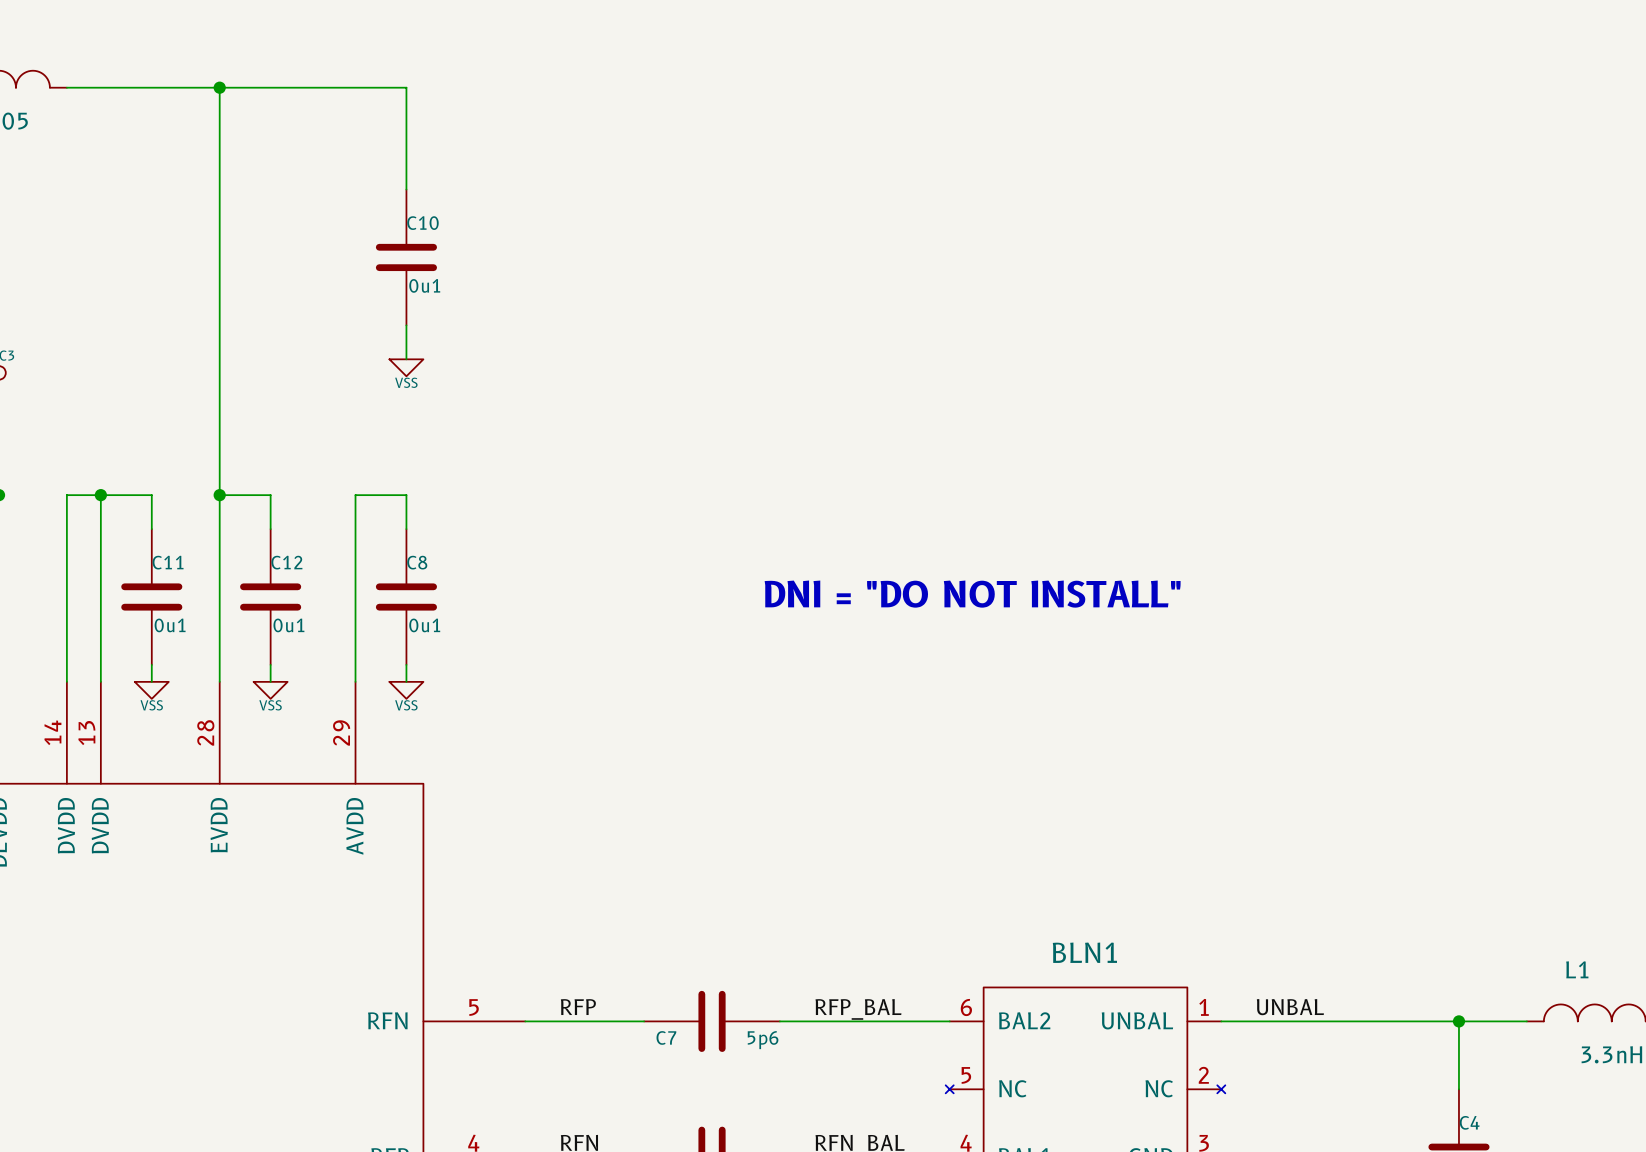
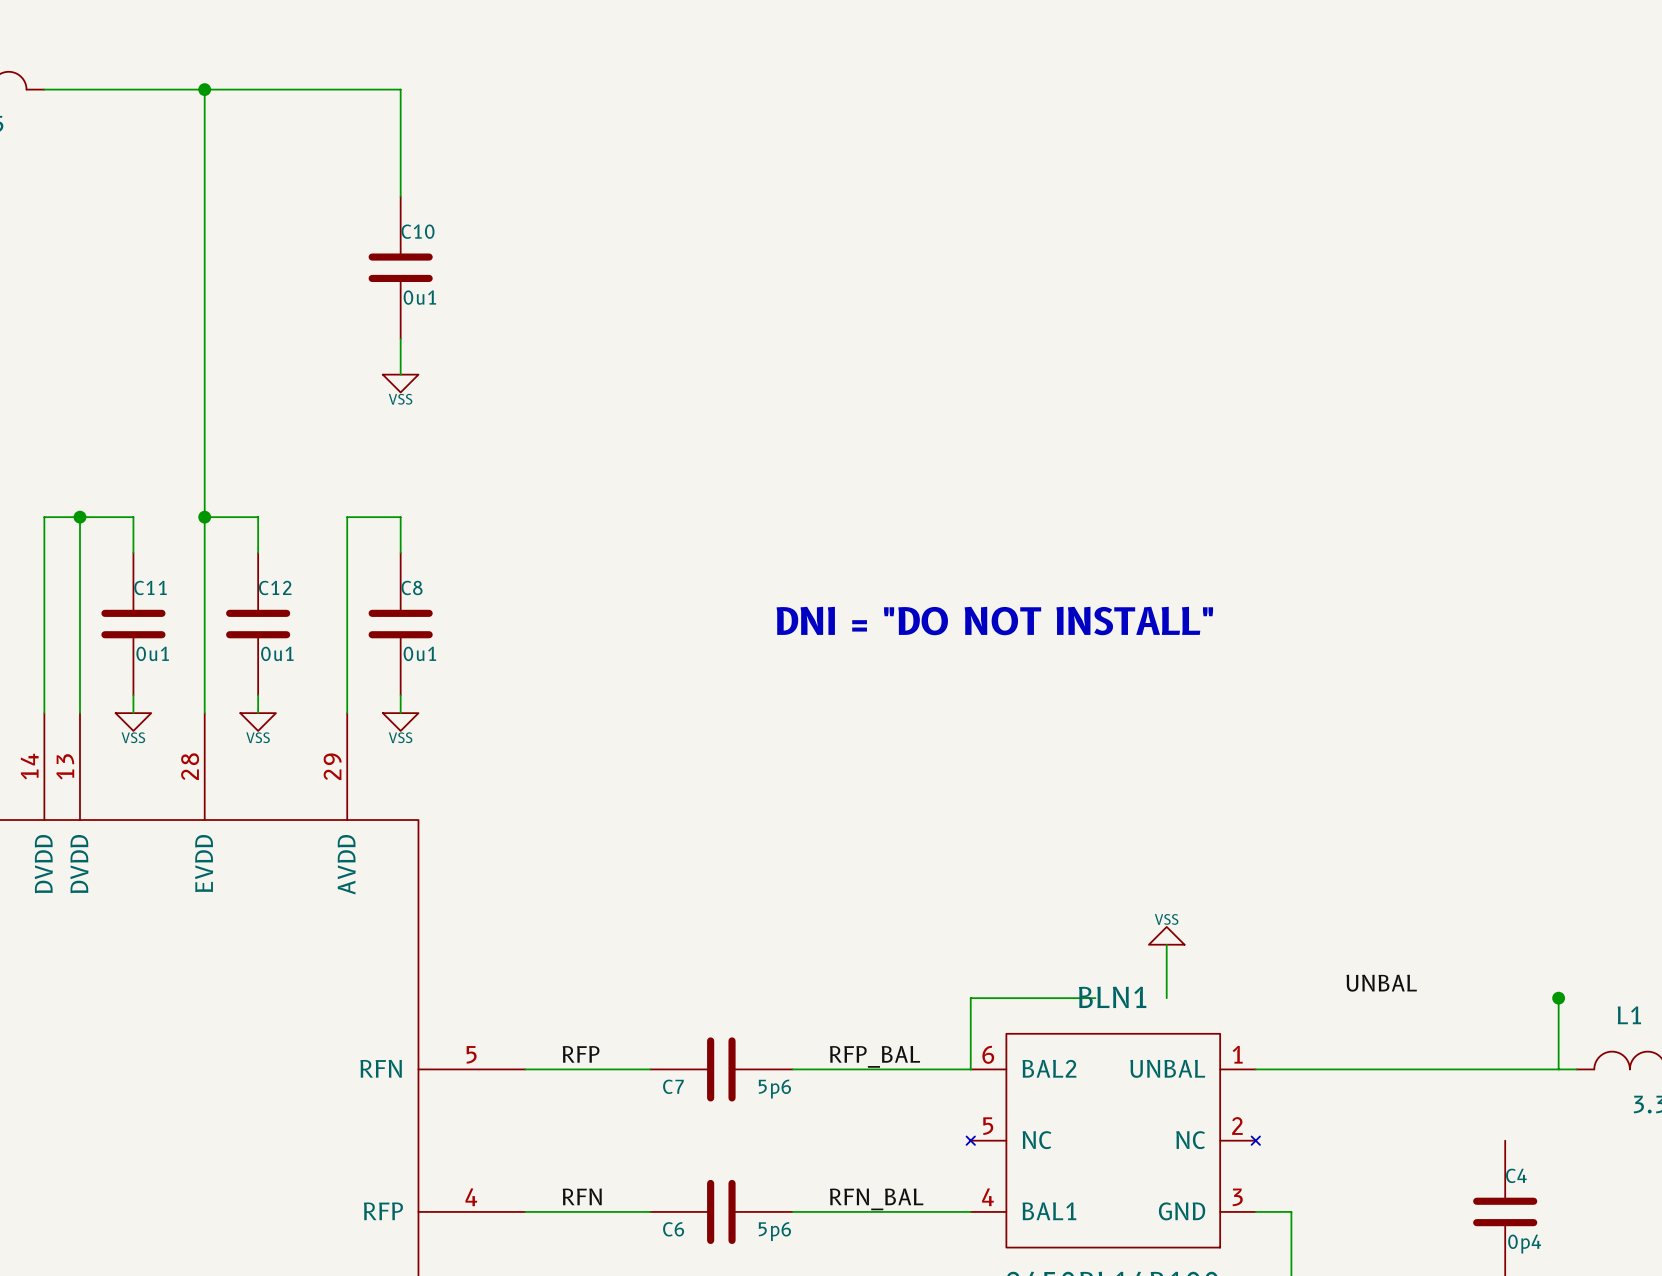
power symbol: none -> VSS (1166, 935)
wire: none -> (1166, 944) (1166, 998)
wire: none -> (1095, 998) (970, 998) (970, 1069)
junction: none -> (1558, 998)
label position: UNBAL (1290, 1007) -> UNBAL (1381, 983)
wire: (1458, 1021) (1458, 1089) -> (1558, 998) (1558, 1069)
junction: (1458, 1021) -> none

